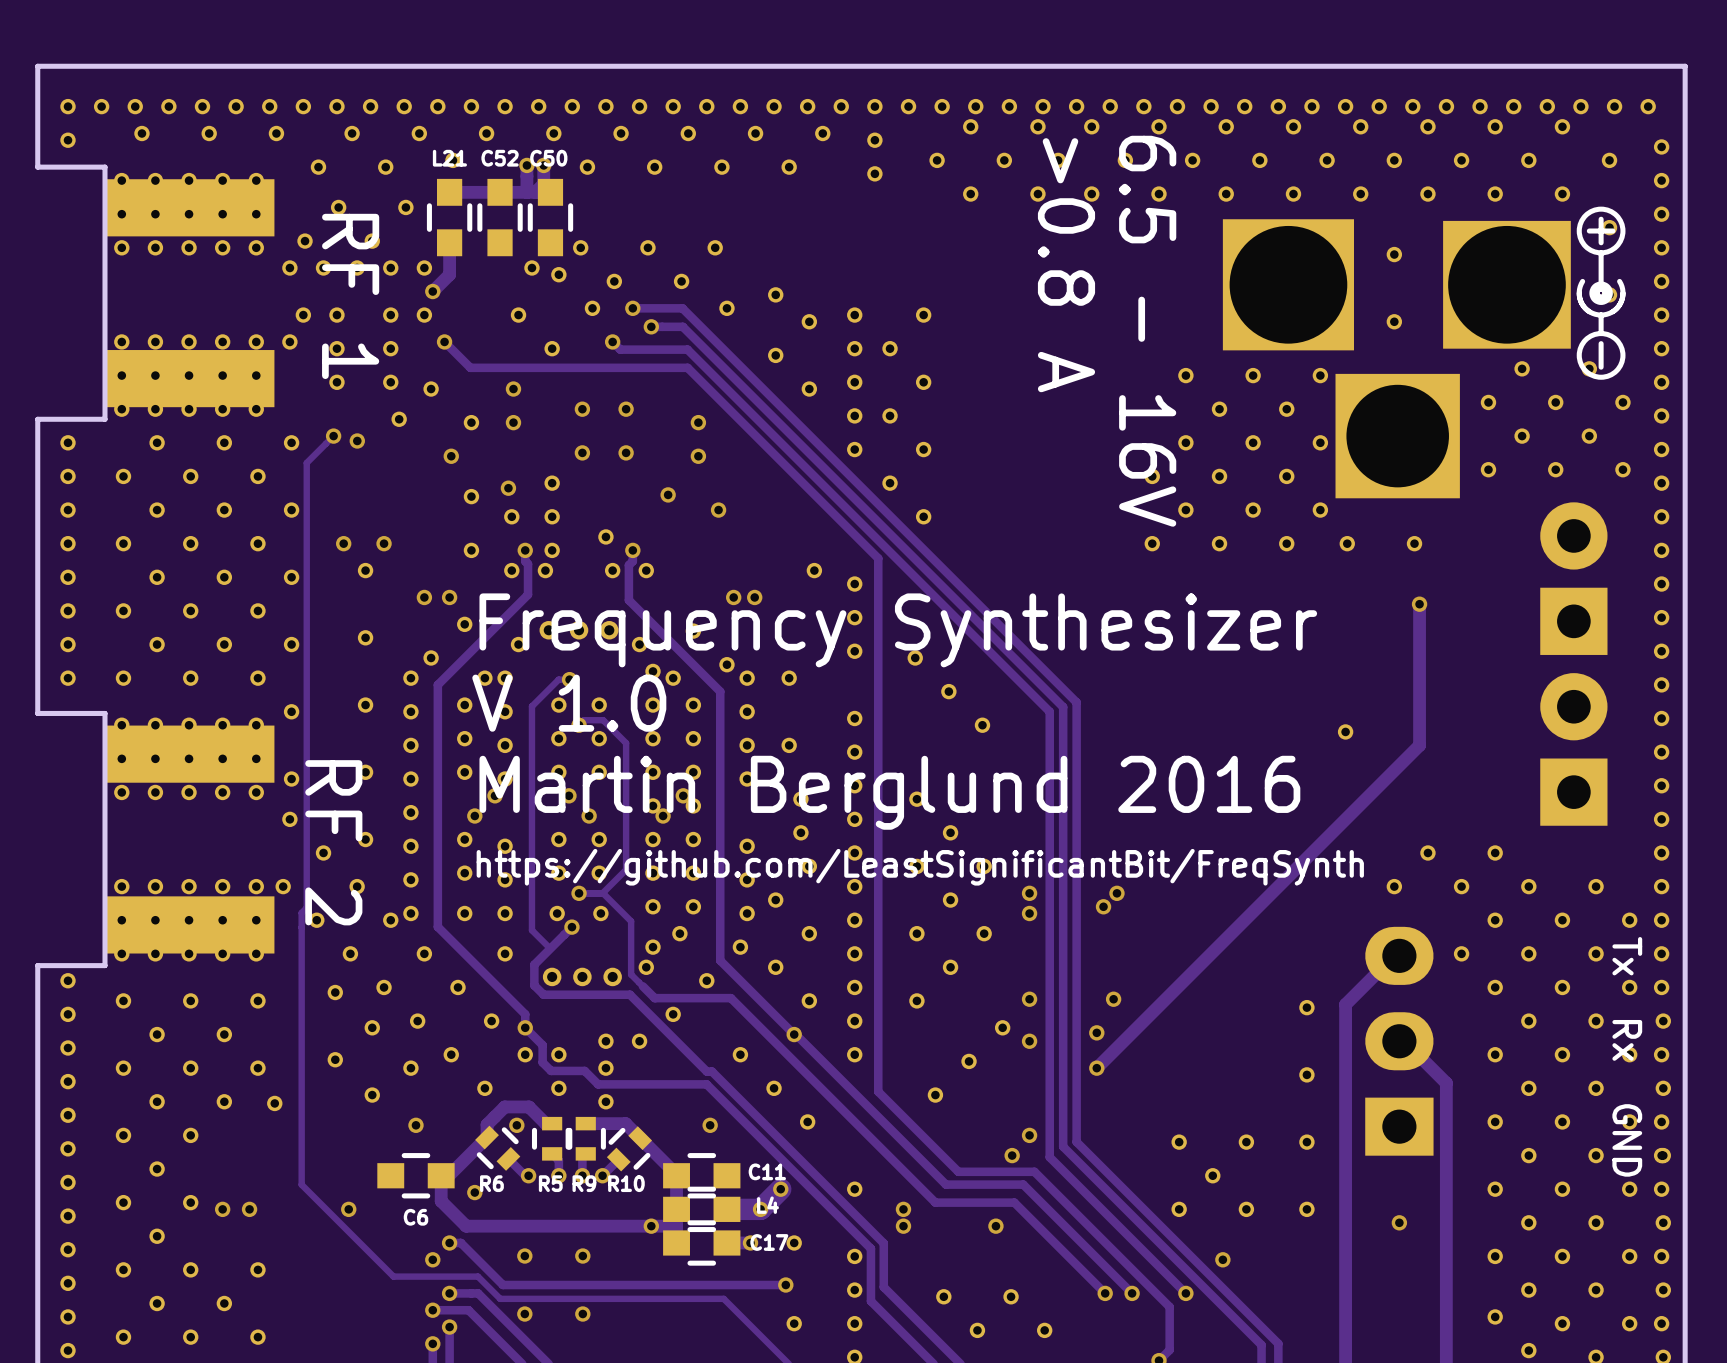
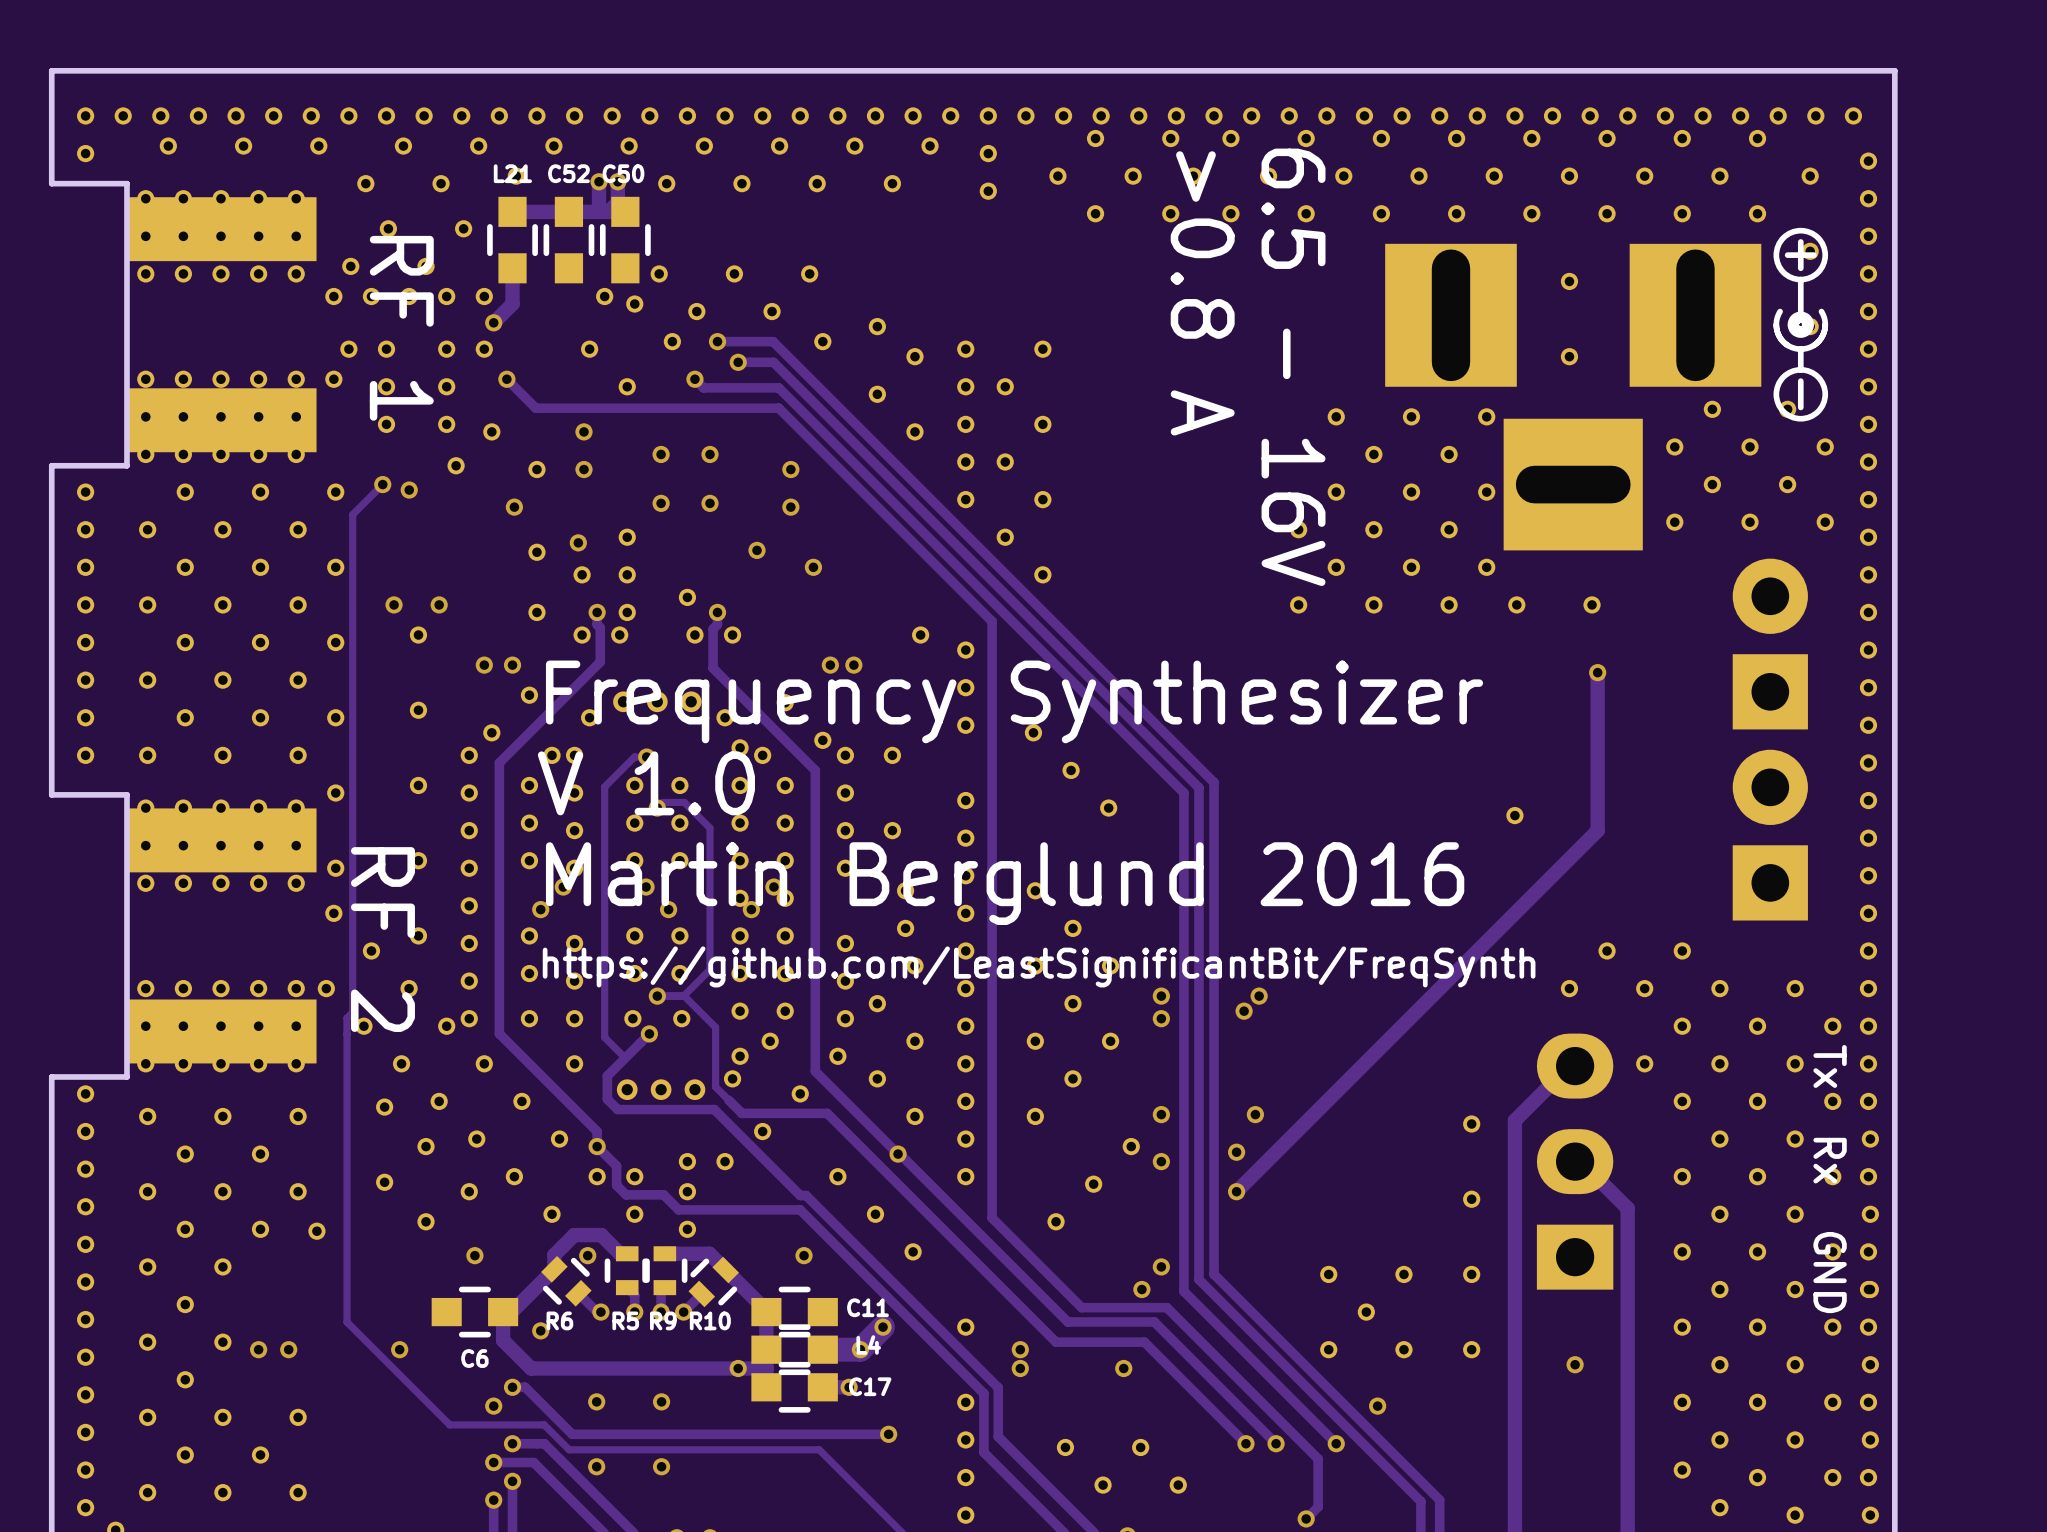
part footprint: [1222, 219, 1571, 499] -> [1385, 243, 1762, 551]
part: (794, 1242) -> none
part: (794, 1323) -> none

